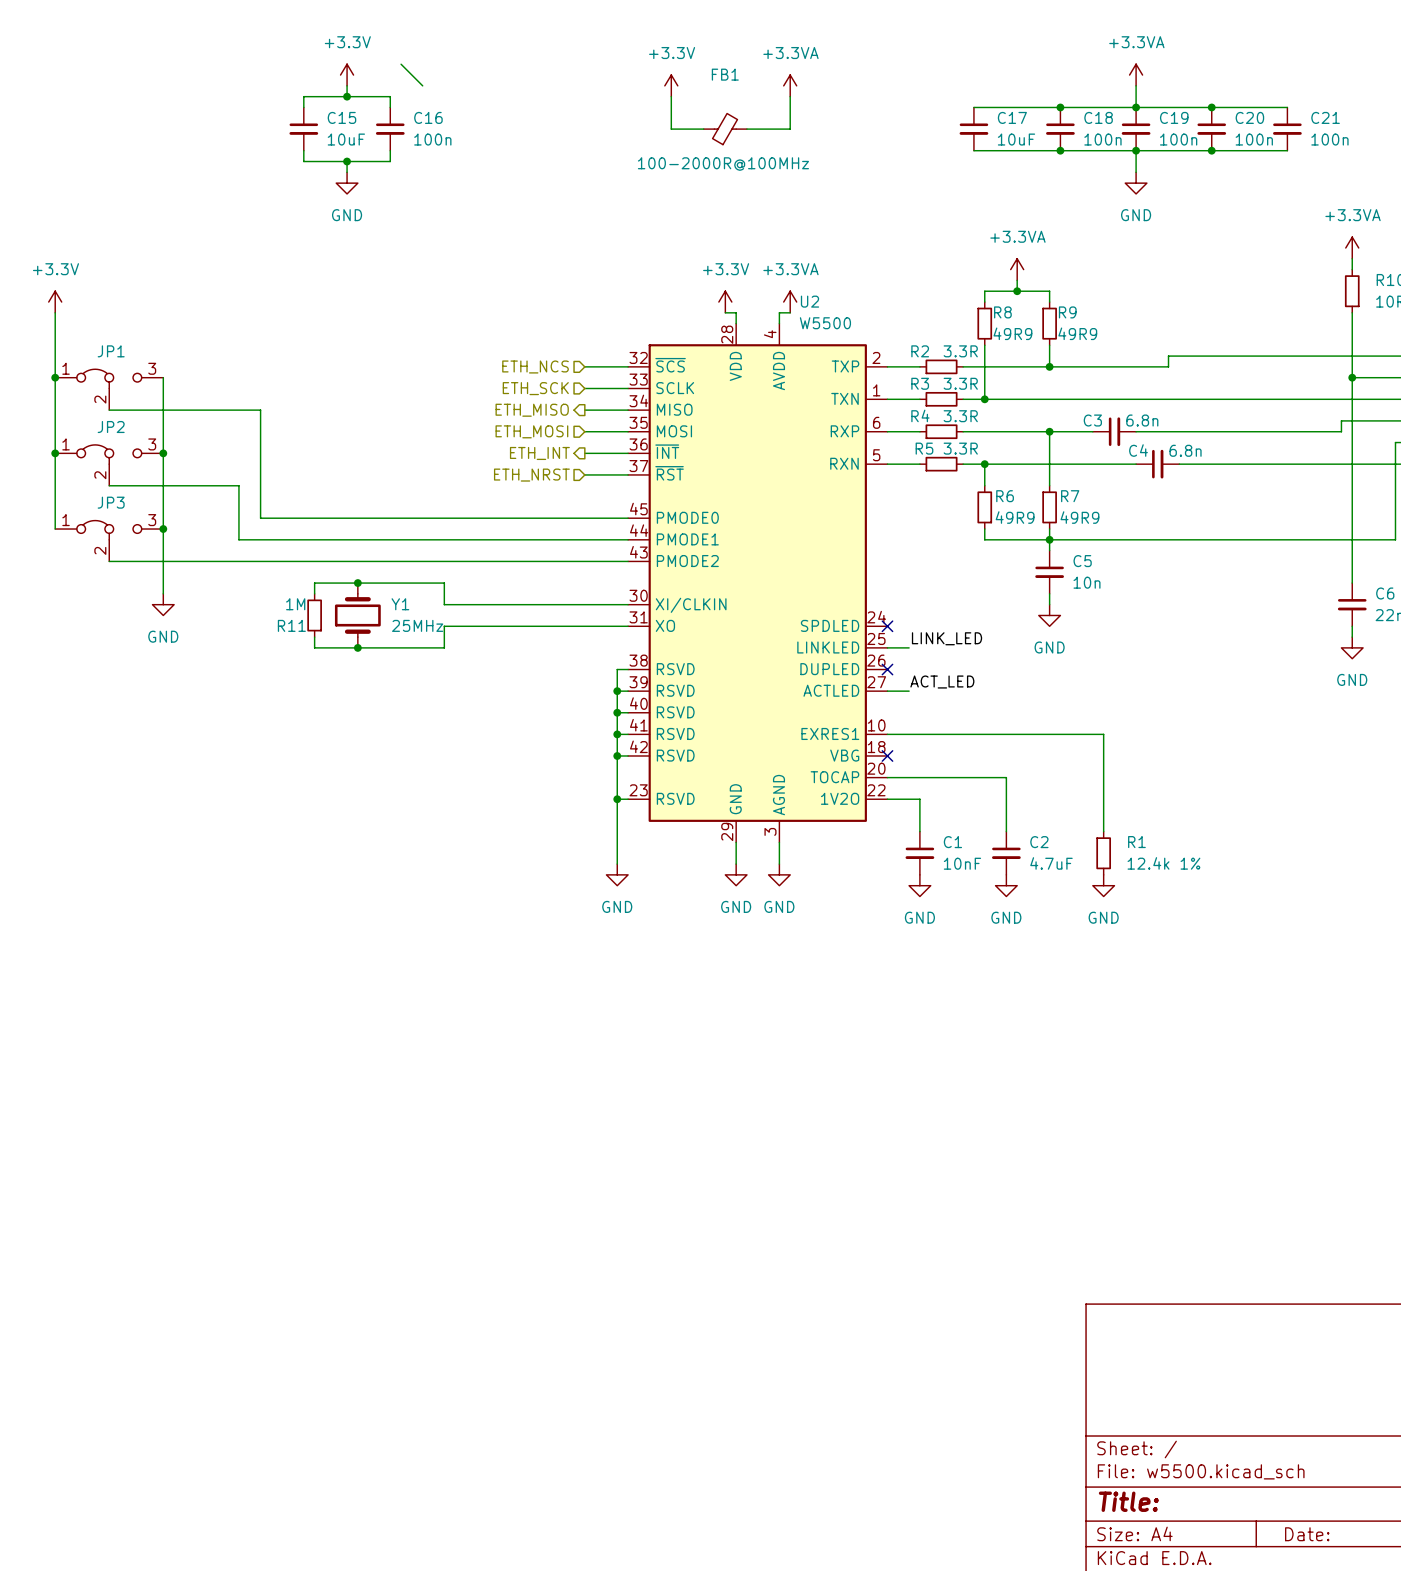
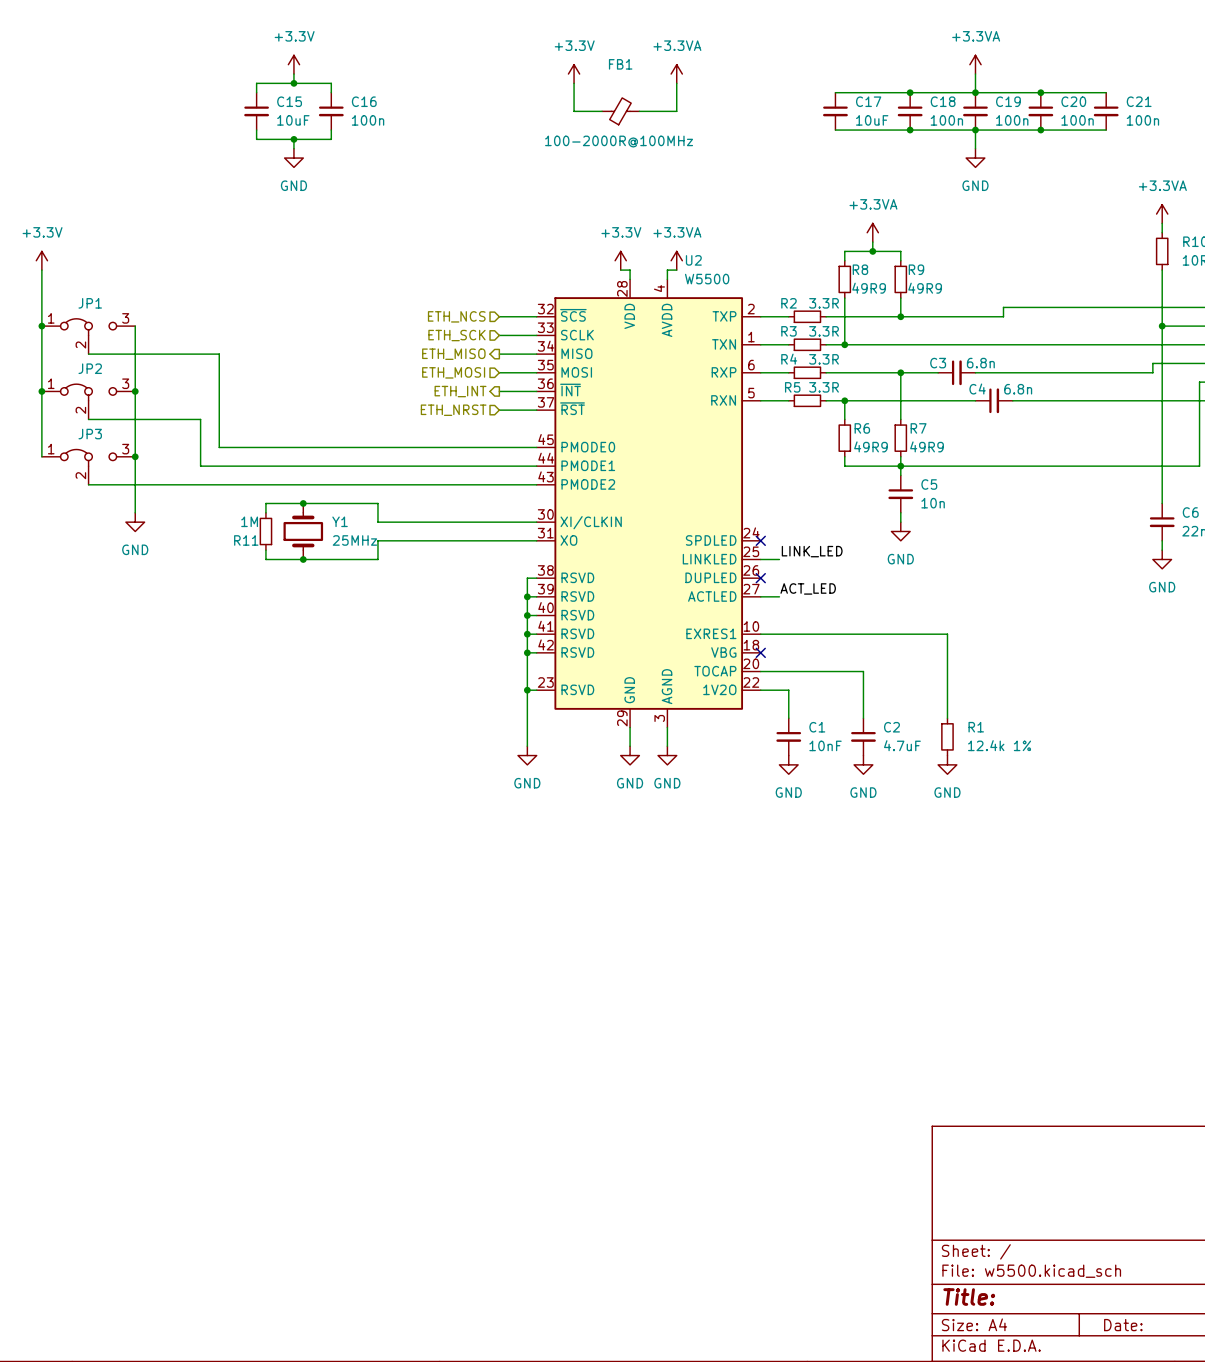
wire: (401, 64) (422, 85) -> none

